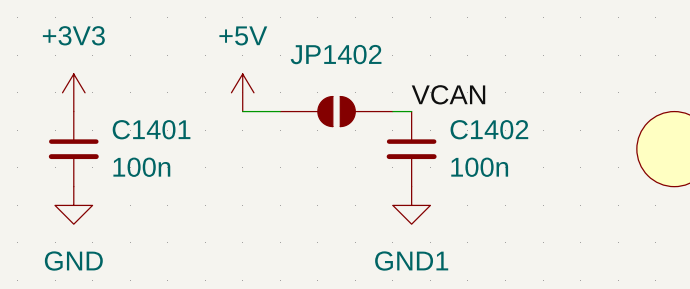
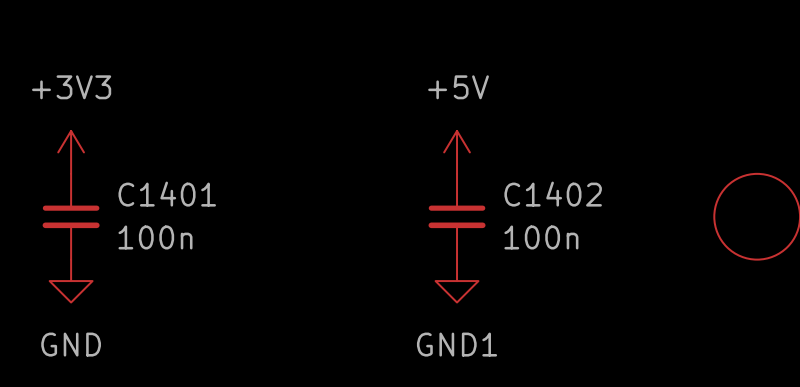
power symbol position: +5V (242, 92) -> +5V (457, 152)
label: VCAN (448, 94) -> none
wire: (242, 111) (280, 111) -> none
JP1402: (336, 111) -> none
wire: (392, 111) (411, 111) -> none

